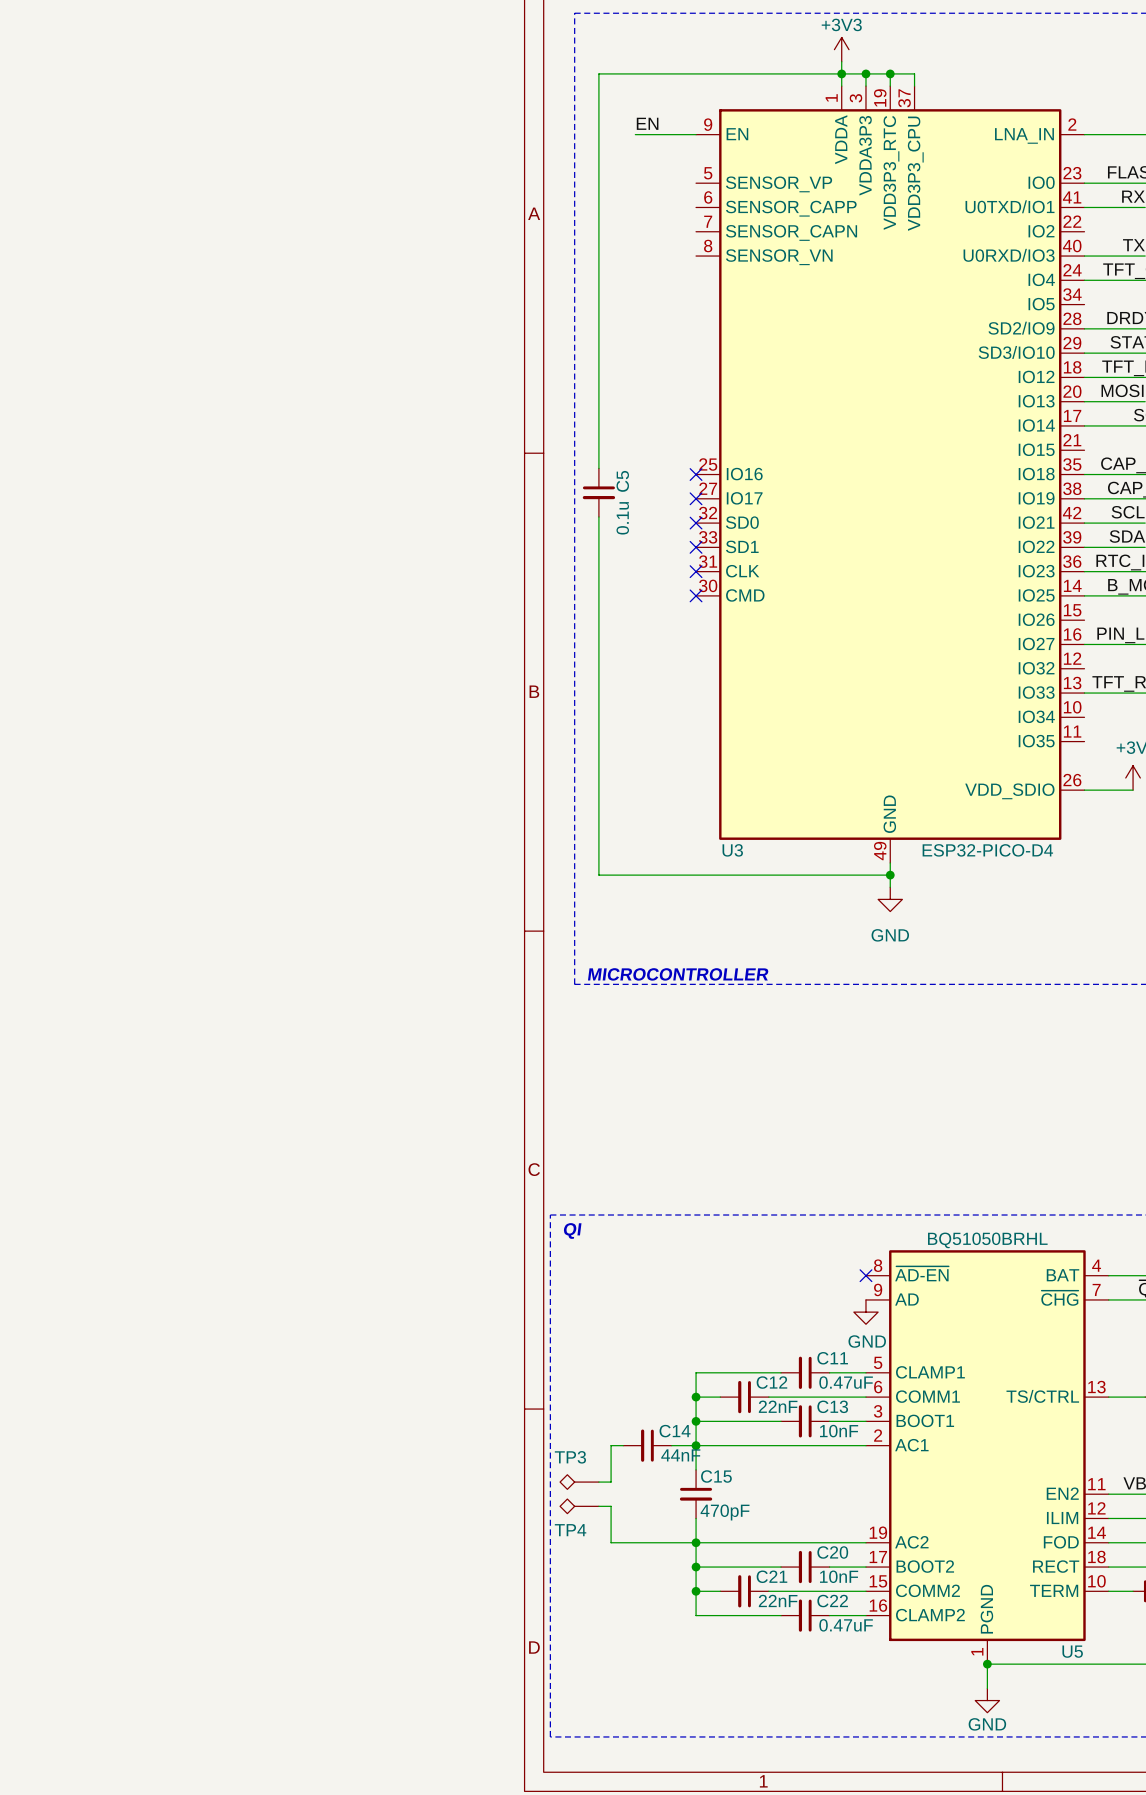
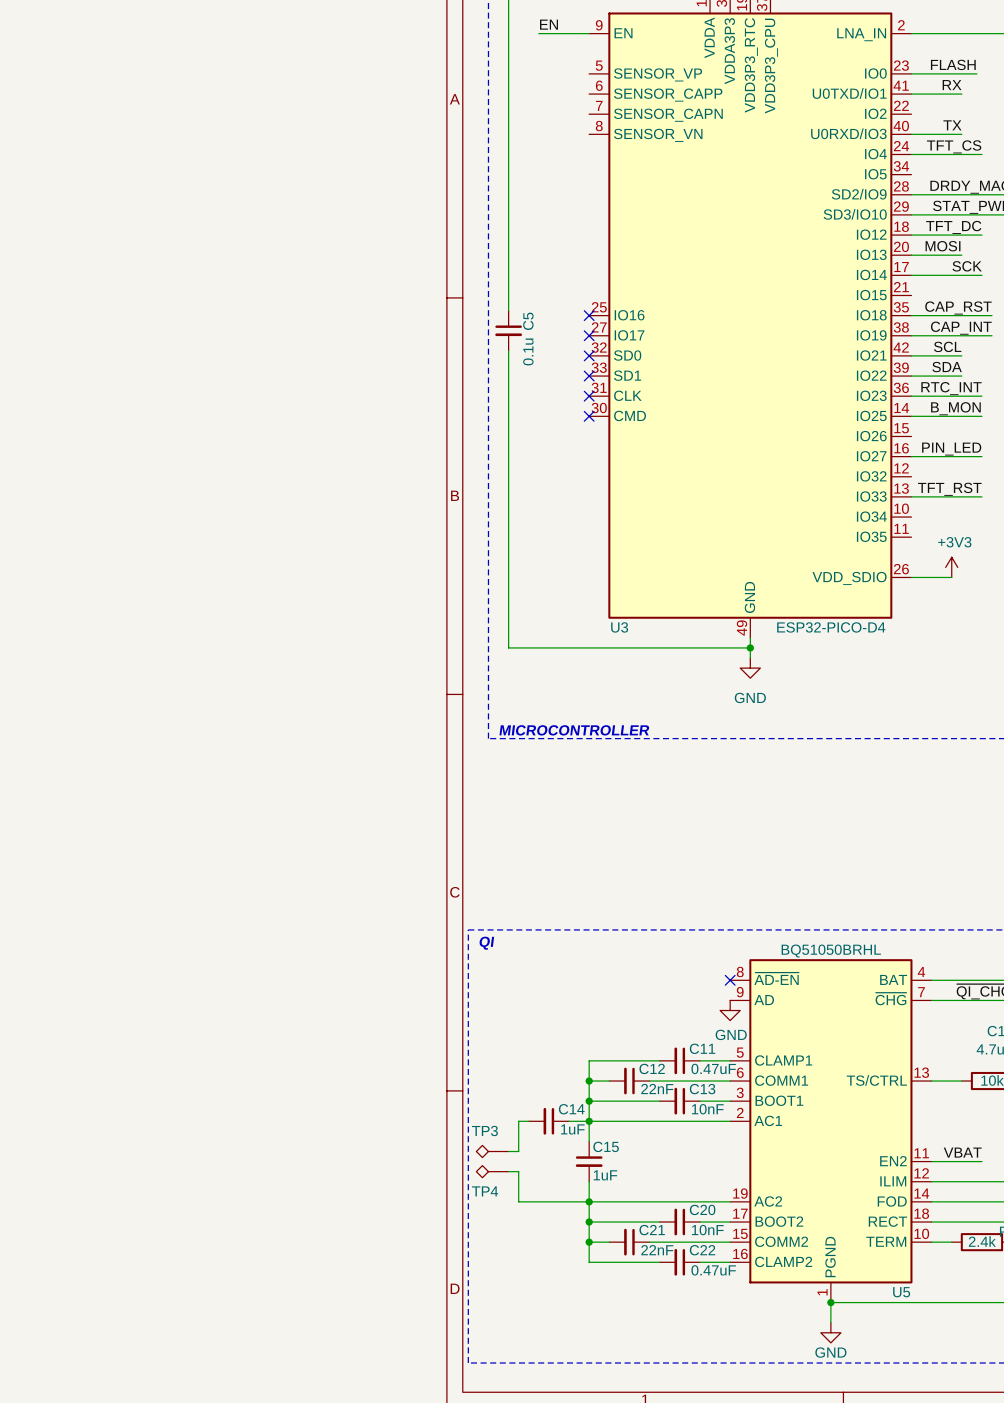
C14 value: 44nF (680, 1455) -> 1uF (572, 1129)
C15 value: 470pF (725, 1512) -> 1uF (605, 1175)

